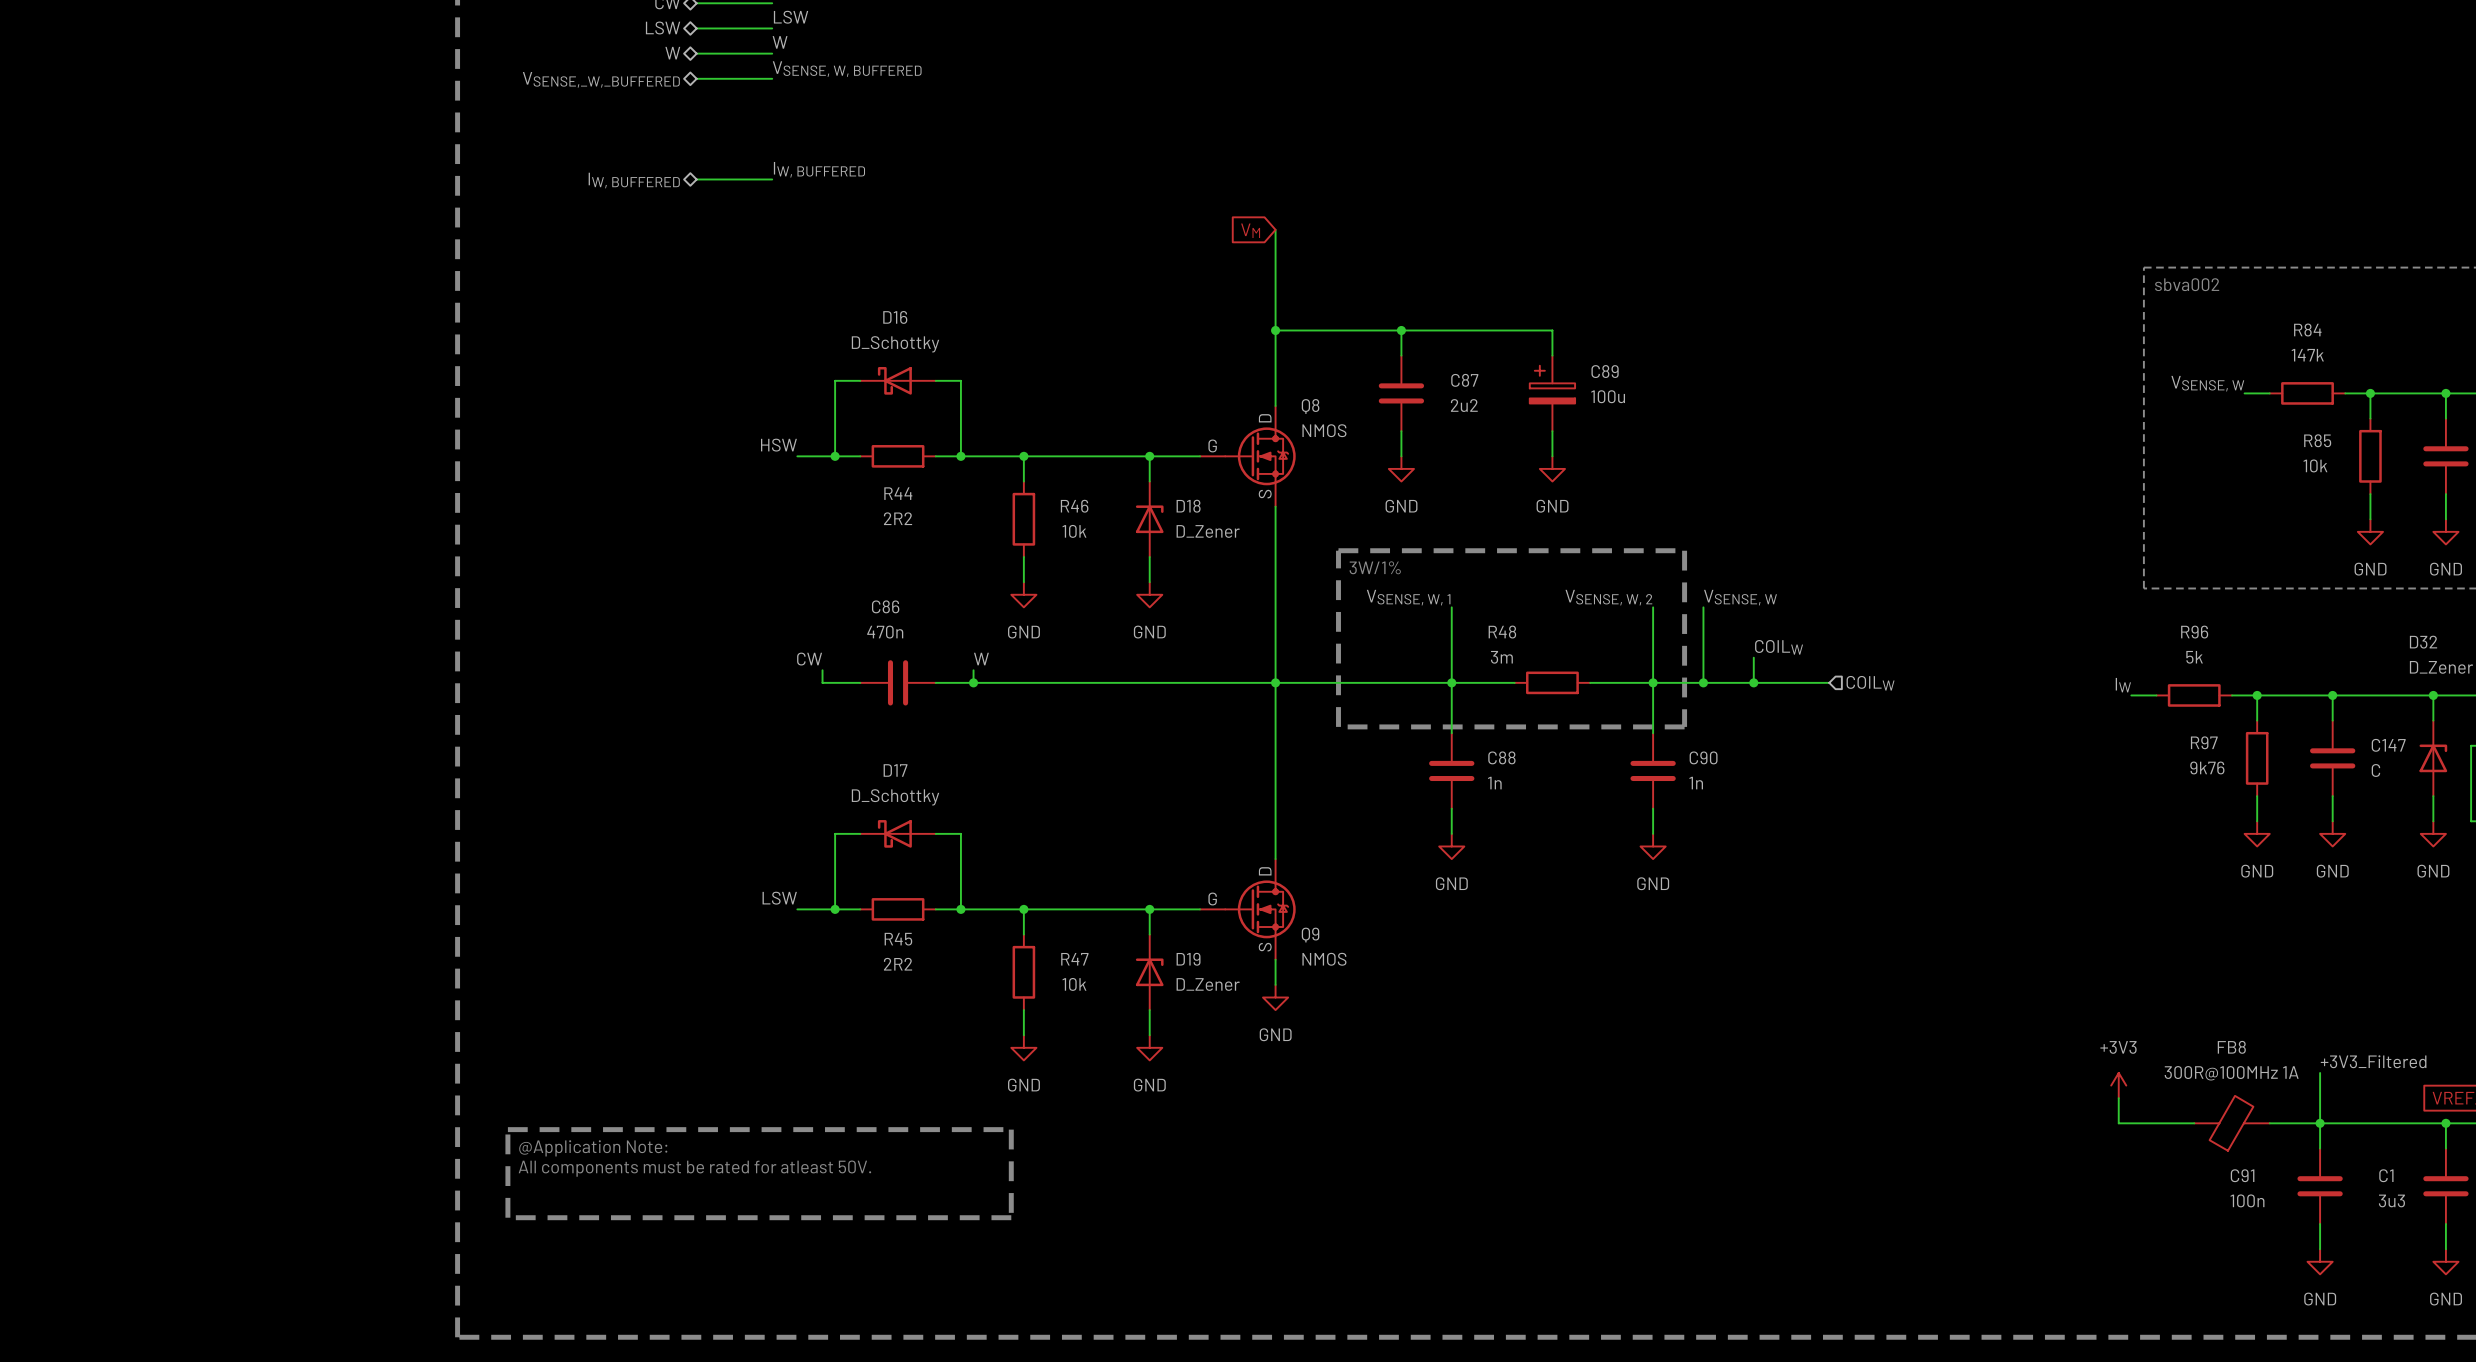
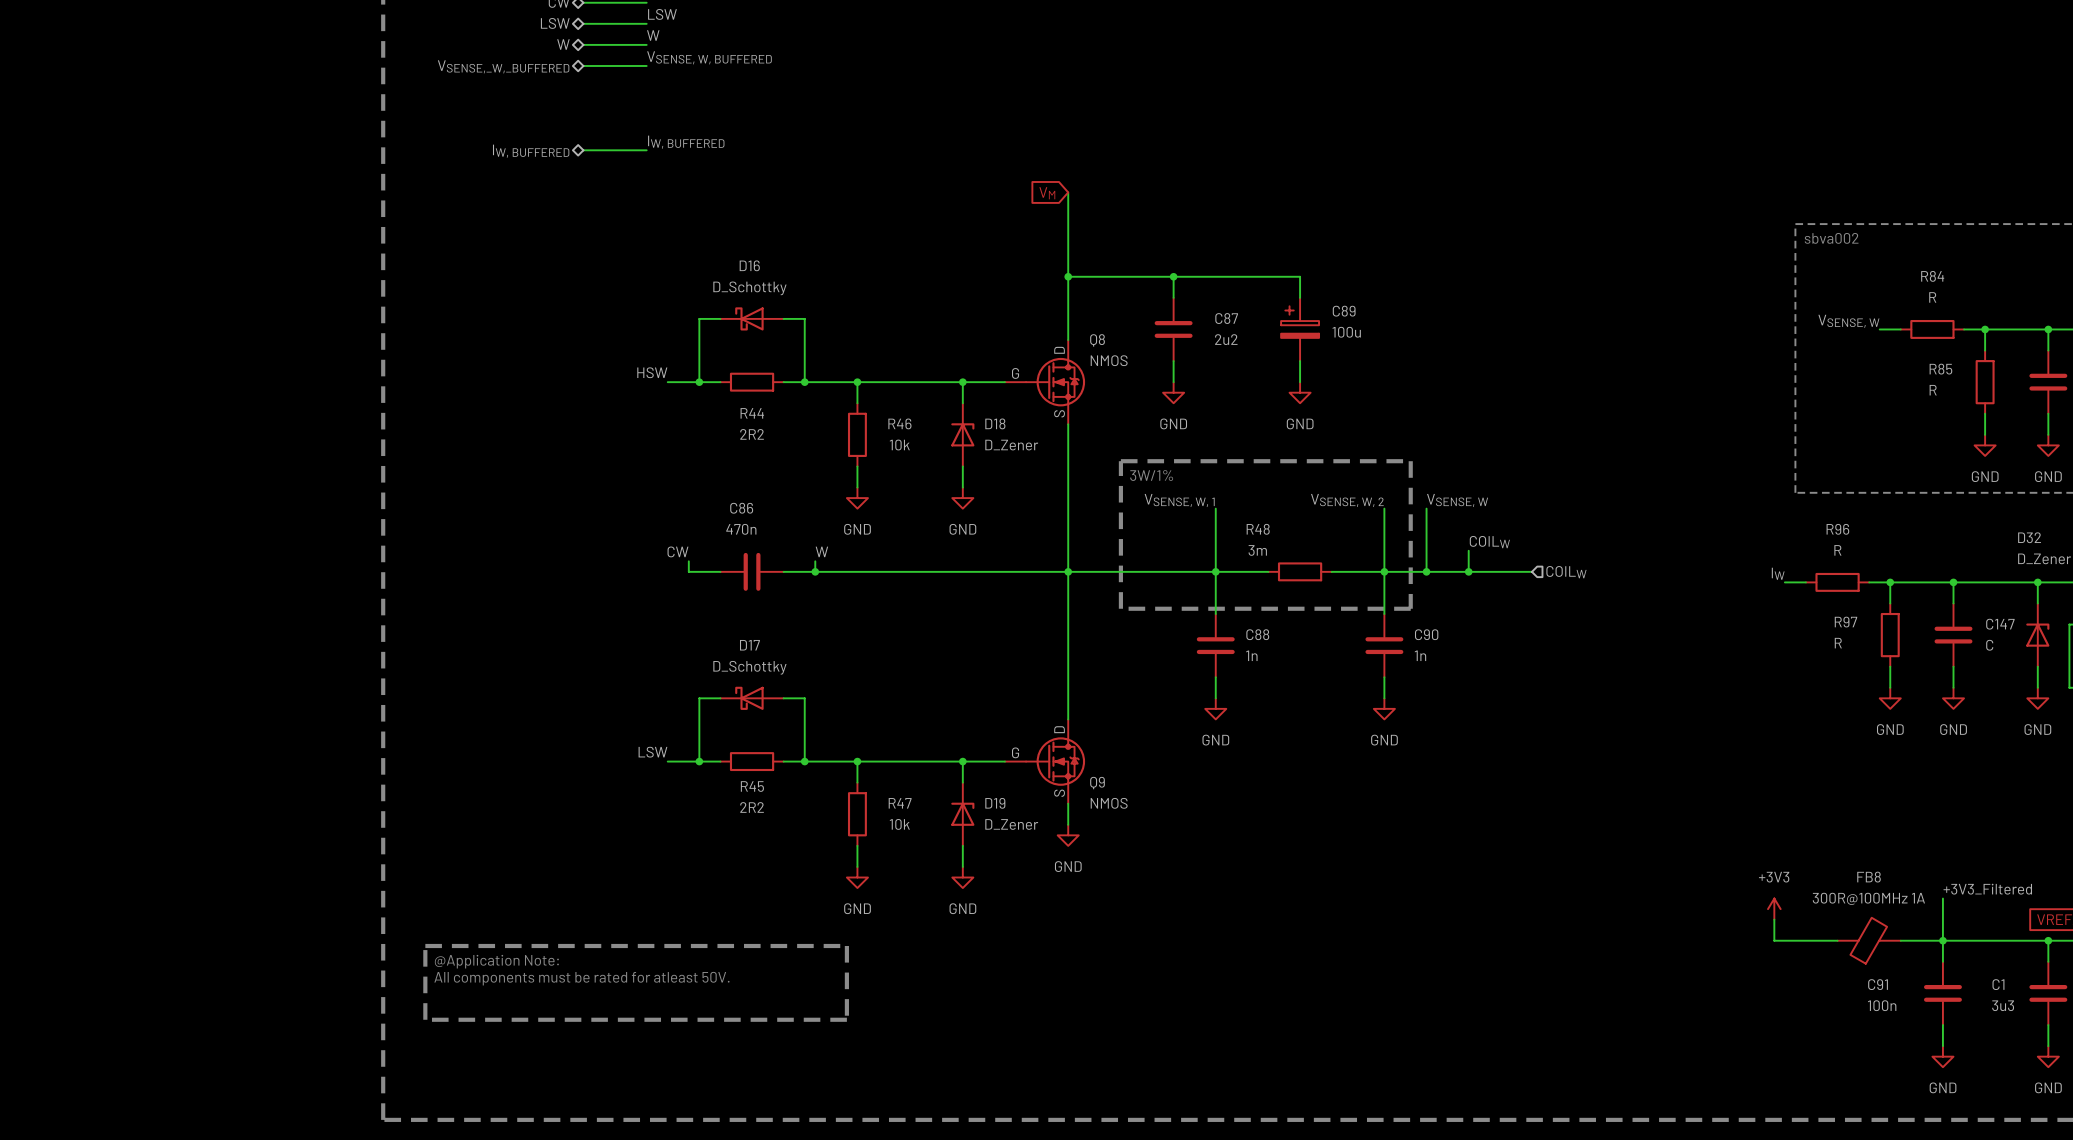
R84 value: 147k (2307, 355) -> R (1932, 297)
R85 value: 10k (2315, 465) -> R (1933, 390)
R96 value: 5k (2194, 657) -> R (1837, 550)
R97 value: 9k76 (2207, 767) -> R (1838, 643)

